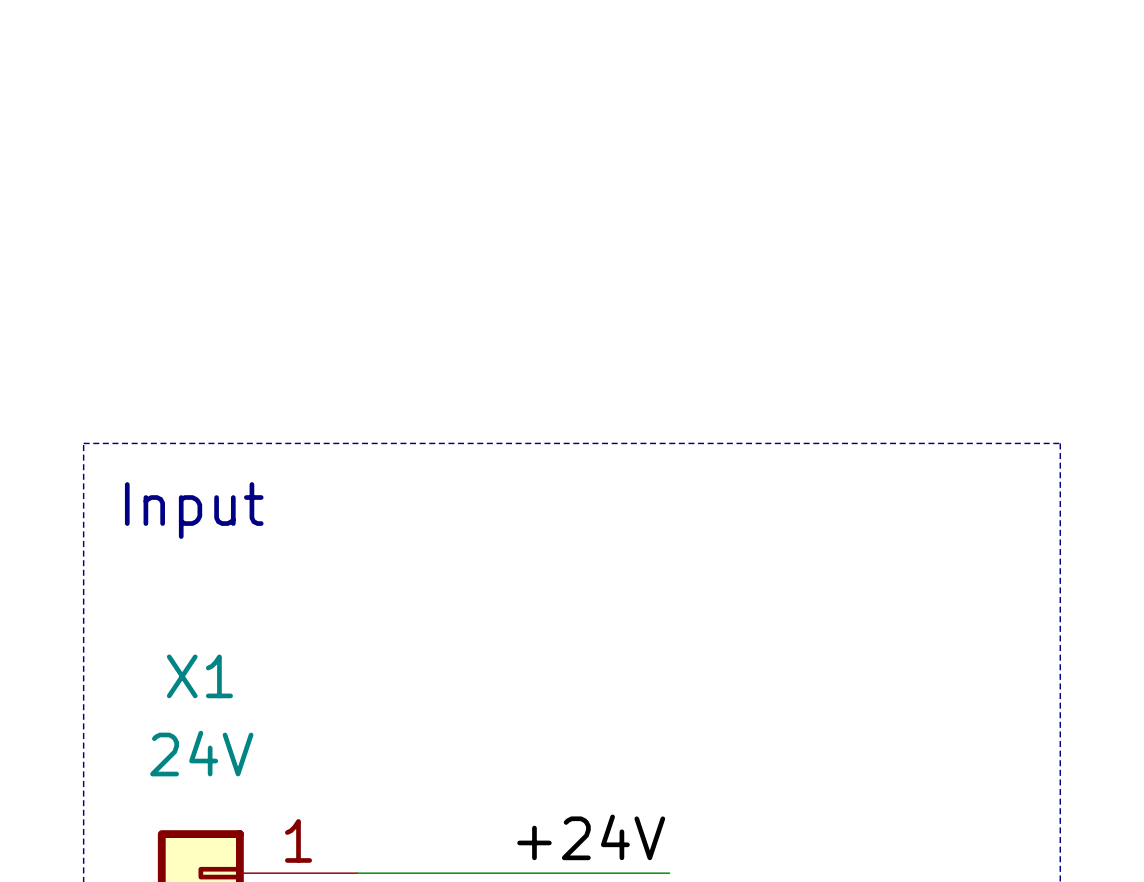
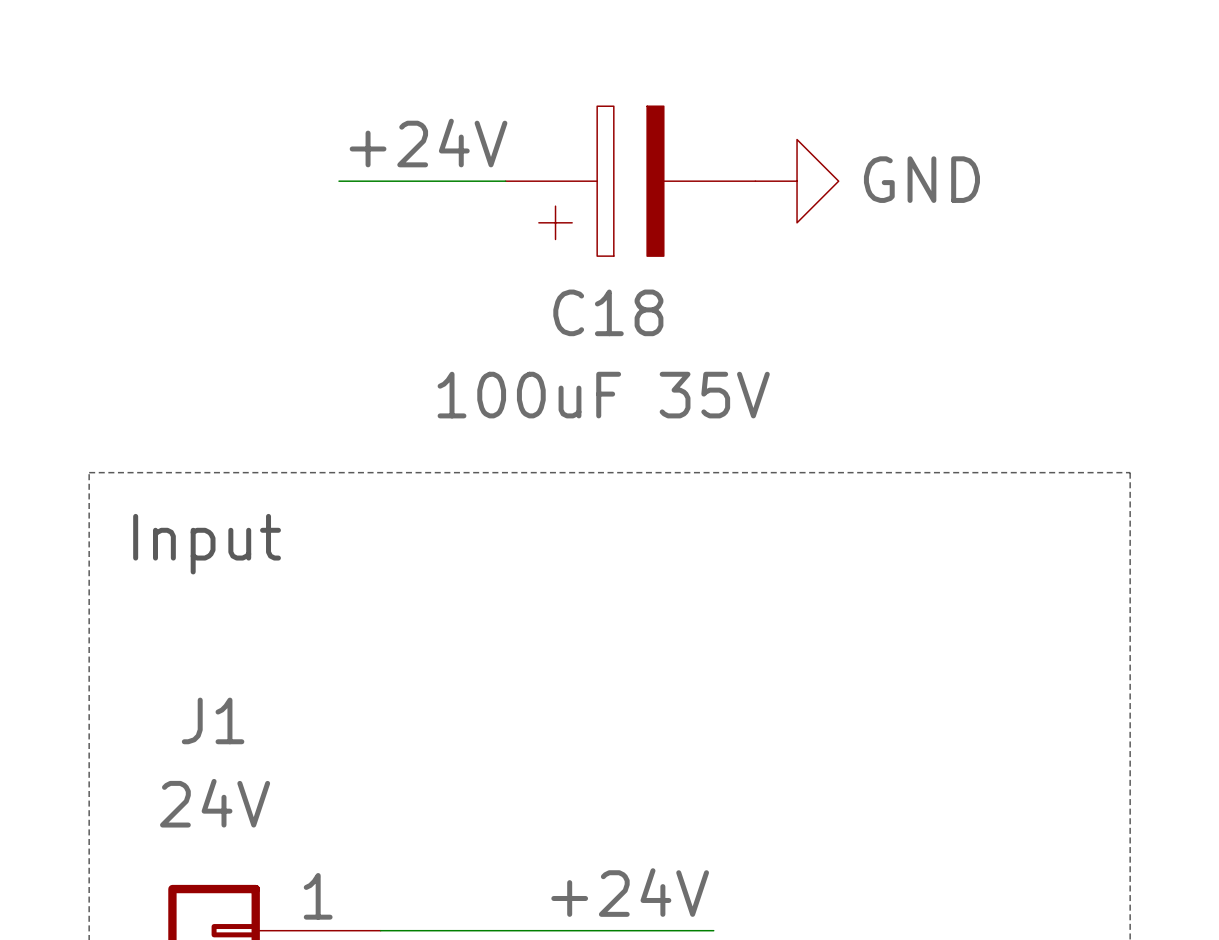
label: none -> +24V (428, 143)
wire: none -> (338, 181) (505, 181)
C18: none -> 100uF 35V (630, 181)
power symbol: none -> GND (797, 181)
X1 name: X1 (199, 676) -> J1 (213, 720)

